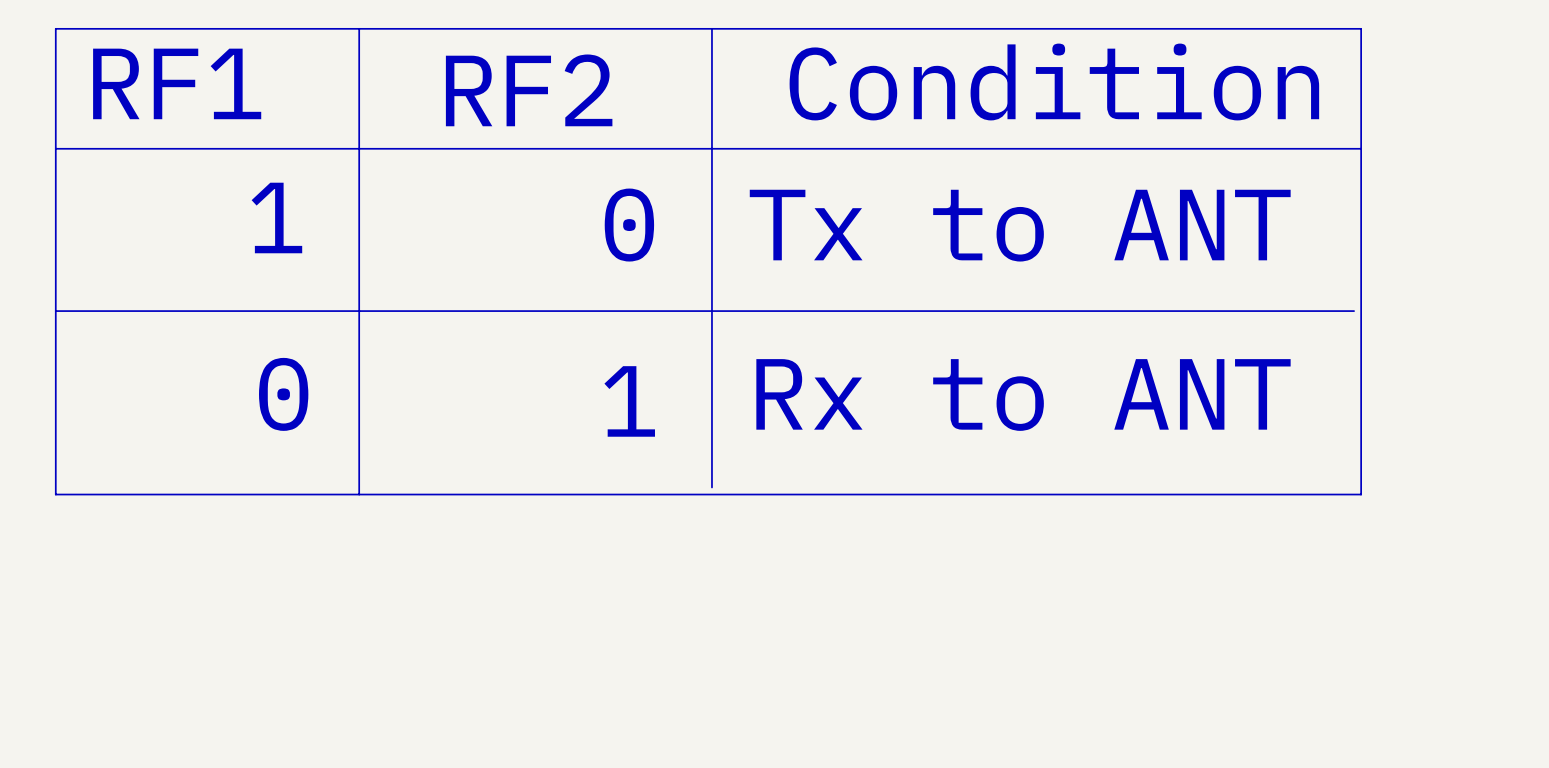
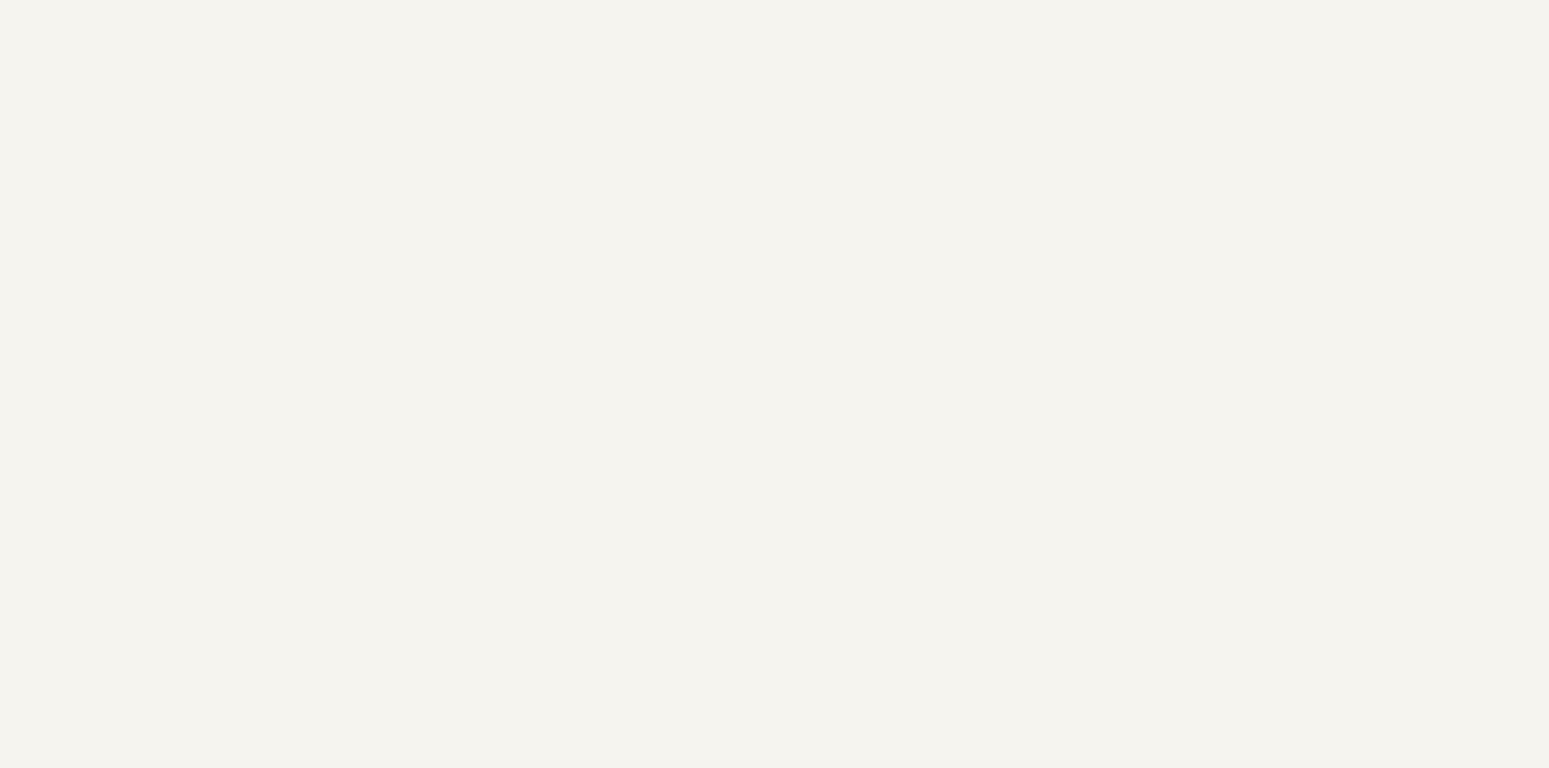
line: (55, 28) (1361, 28) (1361, 494) (55, 494) (55, 28) -> none
line: (359, 28) (359, 494) -> none
line: (711, 28) (711, 487) -> none
text: Condition (1054, 82) -> none
text: RF1 (177, 83) -> none
text: RF2 (529, 90) -> none
line: (55, 148) (1361, 148) -> none
text: 1 (276, 217) -> none
text: 0 (629, 225) -> none
text: Tx to ANT (1020, 225) -> none
line: (55, 311) (1354, 311) -> none
text: 0 (283, 394) -> none
text: Rx to ANT (1023, 394) -> none
text: 1 (629, 401) -> none

